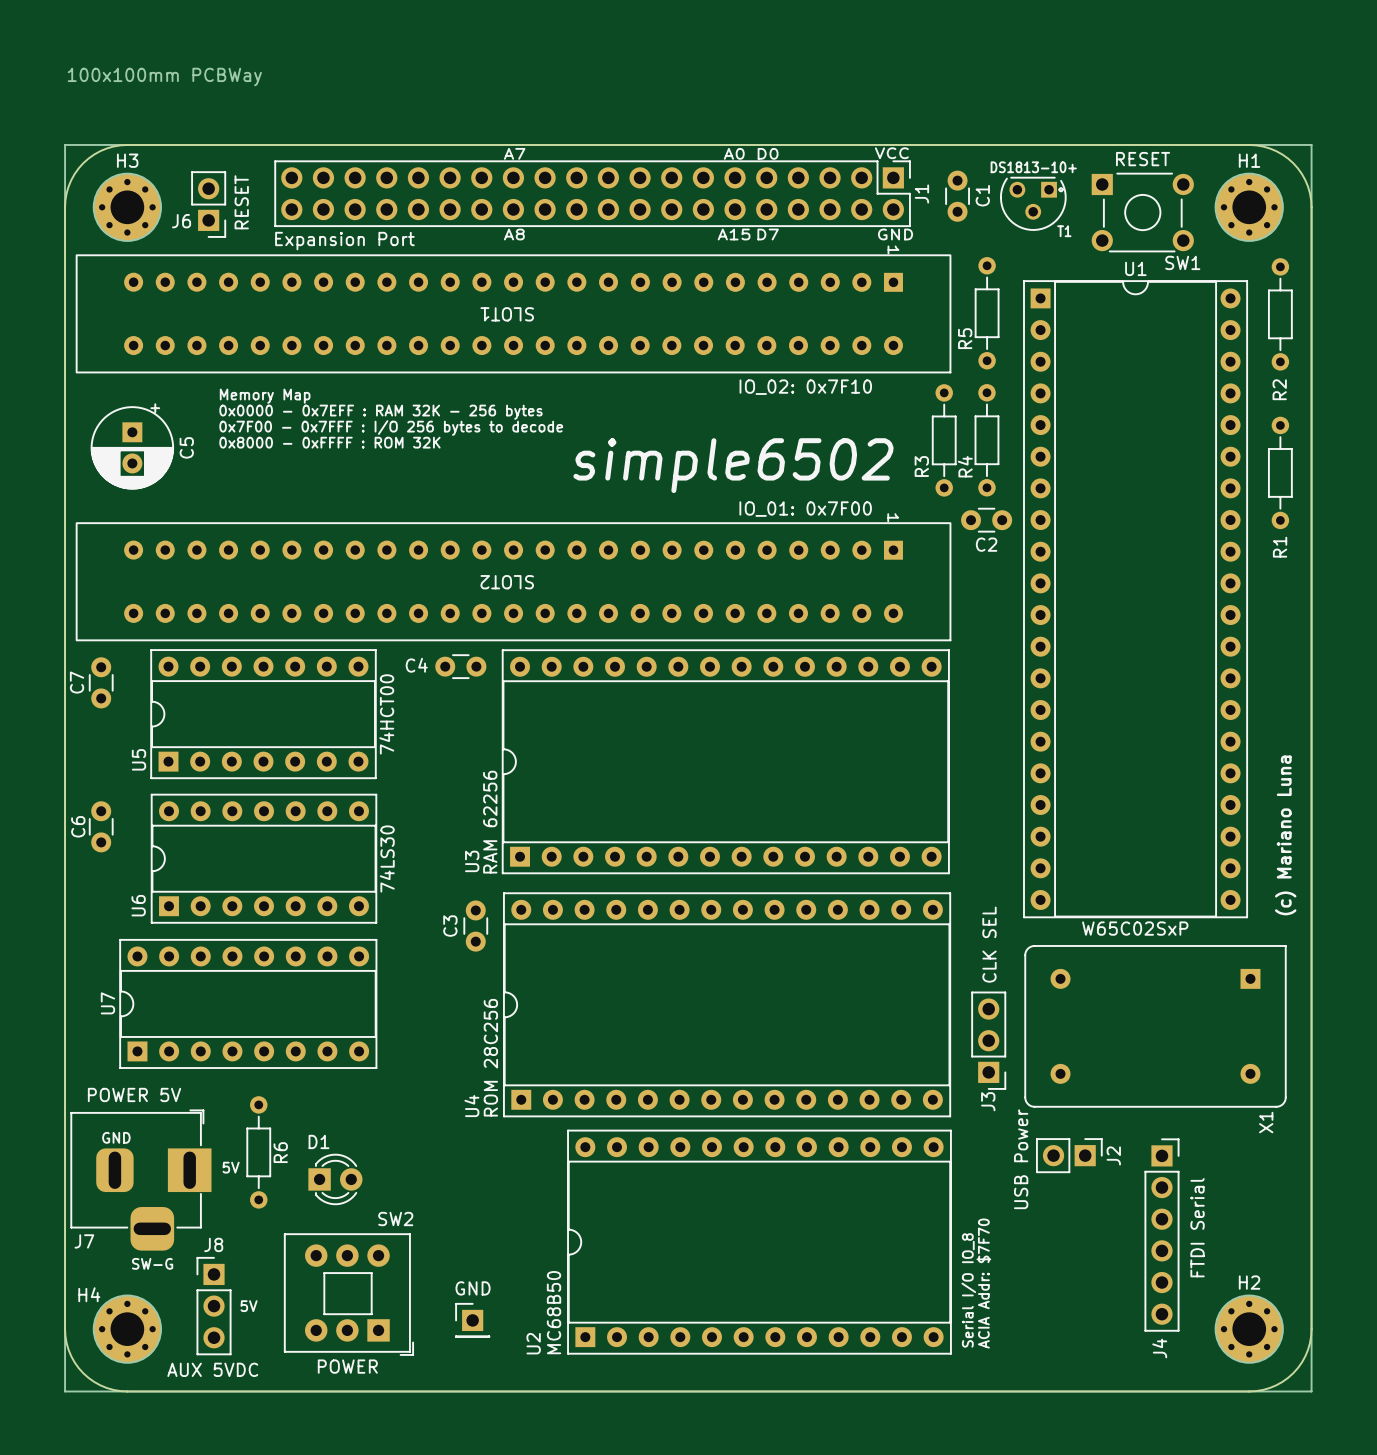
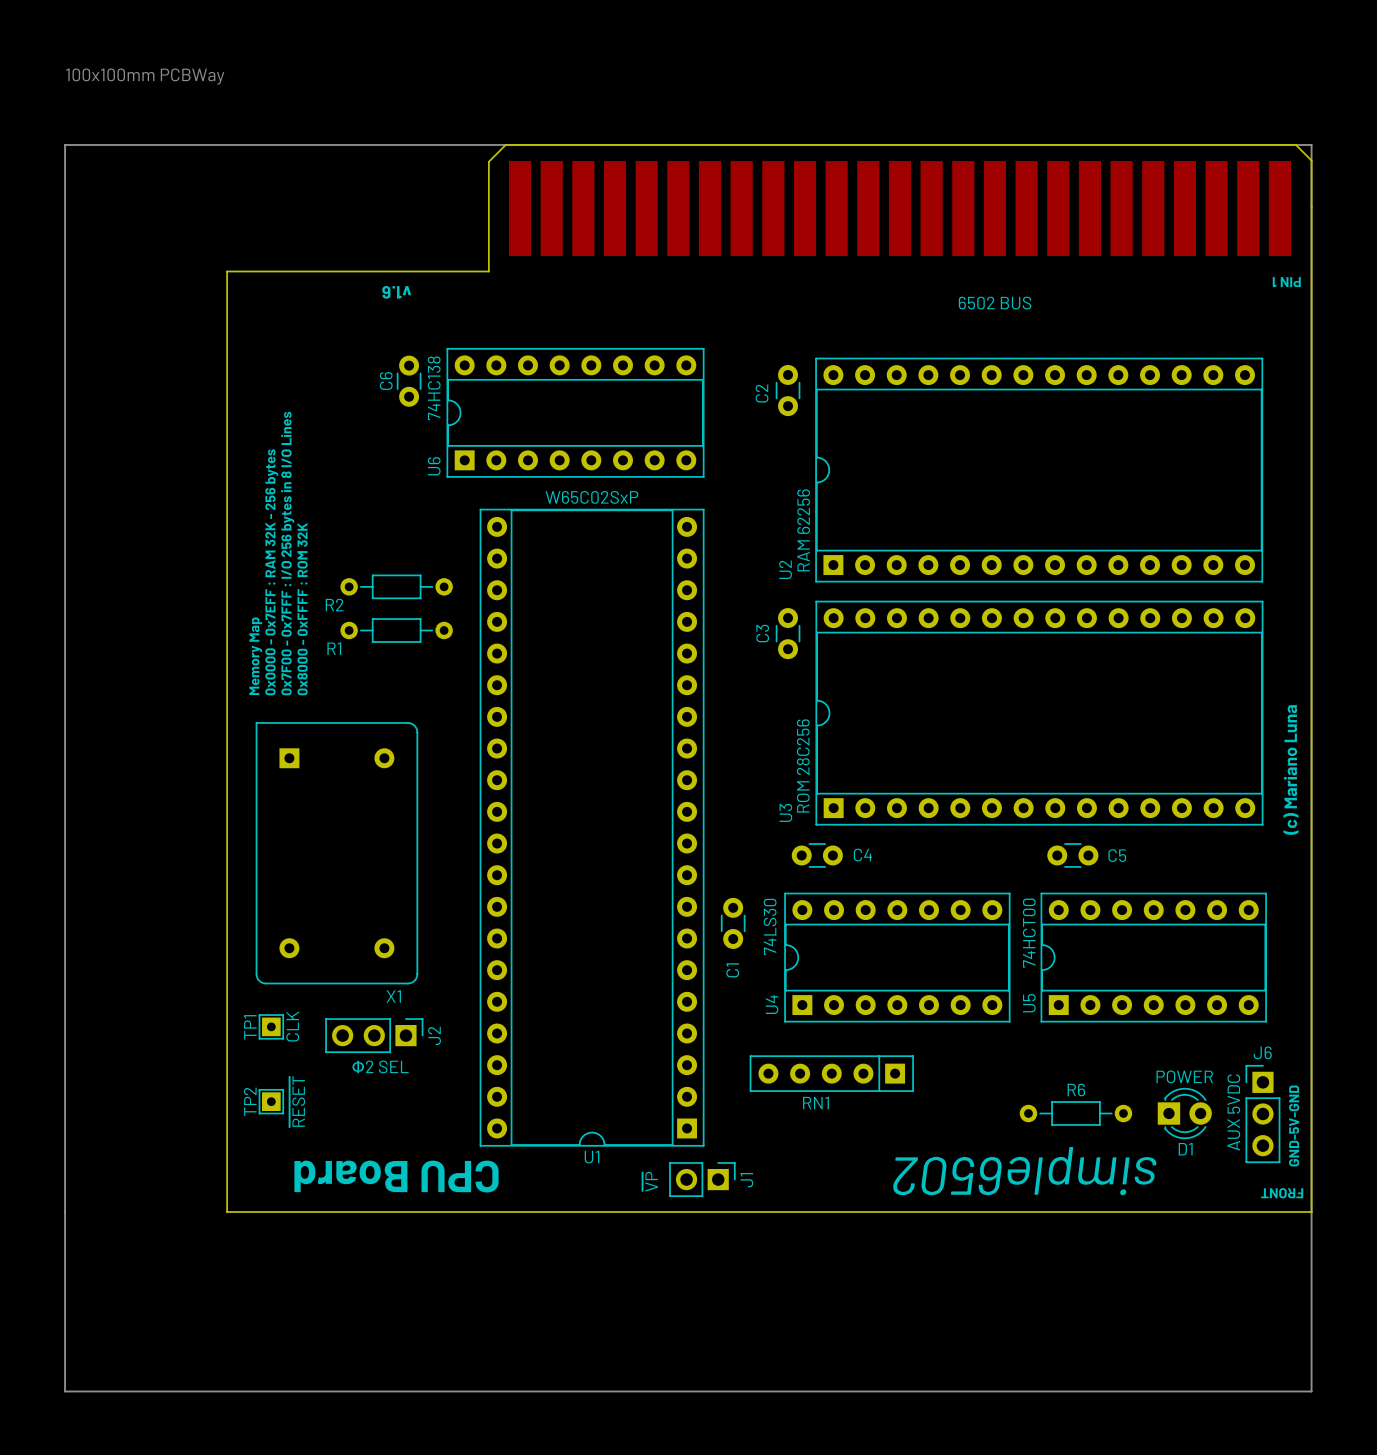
board edge: (505, 144) (120, 145) (100, 151) (88, 158) (78, 168) (68, 186) (65, 207) (65, 1329) (68, 1349) (78, 1368) (88, 1377) (100, 1385) (113, 1389) (127, 1391) (1256, 1391) (1269, 1387) (1288, 1377) (1302, 1362) (1308, 1349) (1311, 1329) (1311, 1211) -> (505, 144) (488, 161) (488, 271) (227, 271) (227, 1211) (1311, 1211)
board edge: (1249, 144) (1263, 146) (1276, 151) (1293, 163) (1302, 174) (1308, 186) (1311, 207) -> (1249, 144) (1295, 144) (1311, 160) (1311, 207)
text: A7 (514, 153) -> none
text: A0 (734, 153) -> none
text: D0 (768, 153) -> none
text: VCC (891, 153) -> none
J1 footprint: [274, 160, 911, 227] -> [669, 1162, 736, 1197]
J6 footprint: [191, 171, 226, 238] -> [1245, 1065, 1281, 1164]
J1 name position: J1 (921, 194) -> J1 (746, 1180)
C1 name position: C1 (982, 195) -> C1 (732, 970)
C1 position: (957, 196) -> (733, 923)
J6 value: RESET (241, 202) -> AUX 5VDC (1233, 1112)
T1: DS1813-10+ (1033, 203) -> none
H3: (127, 207) -> none
H1: (1249, 207) -> none
part: none -> 6502 BUS (899, 208)
SW1: RESET (1142, 212) -> none
J6 name position: J6 (181, 221) -> J6 (1262, 1052)
text: A8 (514, 234) -> none
text: A15 (734, 234) -> none
text: D7 (768, 234) -> none
text: GND (895, 234) -> none
J1 value: Expansion Port (344, 241) -> ~{VP} (650, 1181)
text: none -> PIN 1 (1286, 282)
text: none -> v1.6 (396, 292)
SLOT1: IO_02: 0x7F10 (513, 313) -> none
R5: (987, 313) -> none
R2 rotation: 0° (1280, 314) -> 90° clockwise (396, 586)
R2 position: (1280, 314) -> (396, 586)
text rotation: 0° (265, 396) -> 90° counterclockwise (255, 656)
text position: Memory Map (265, 396) -> Memory Map (255, 656)
C5 footprint: [90, 403, 174, 490] -> [1047, 843, 1099, 868]
text rotation: 0° (381, 412) -> 90° counterclockwise (271, 572)
text: 0x7F00 - 0x7FFF : I/O 256 bytes to decode (391, 428) -> 0x7F00 - 0x7FFF : I/O 256 bytes in 8 I/O Lines (287, 553)
R3: (944, 440) -> none
R4: (986, 440) -> none
text rotation: 0° (329, 442) -> 90° counterclockwise (302, 609)
text: simple6502 (733, 465) -> none
R1 rotation: 0° (1280, 472) -> 90° clockwise (396, 630)
R1 position: (1280, 472) -> (396, 630)
C2 rotation: 0° (986, 520) -> 90° clockwise (788, 390)
C2 position: (986, 520) -> (788, 390)
SLOT2: IO_01: 0x7F00 (513, 581) -> none
U1 rotation: 0° (1135, 599) -> 180° (592, 827)
U1 position: (1135, 599) -> (592, 827)
C4 name position: C4 (416, 665) -> C4 (862, 855)
C4 position: (460, 666) -> (817, 855)
C7: (101, 682) -> none
U5 position: (263, 714) -> (1153, 957)
U5 value position: 74HCT00 (386, 714) -> 74HCT00 (1029, 933)
U3 position: (725, 761) -> (1039, 713)
U6 footprint: [150, 793, 378, 924] -> [446, 348, 705, 478]
U3 value: RAM 62256 (490, 822) -> ROM 28C256 (803, 765)
C6 position: (101, 826) -> (409, 381)
text position: (c) Mariano Luna (1285, 835) -> (c) Mariano Luna (1291, 770)
U6 value: 74LS30 (387, 859) -> 74HC138 (434, 388)
U4 footprint: [503, 892, 951, 1118] -> [784, 892, 1011, 1023]
C3 position: (475, 926) -> (788, 633)
U7: (248, 1003) -> none
TP1: none -> CLK (271, 1026)
X1 rotation: 0° (1155, 1026) -> 90° counterclockwise (336, 853)
X1 position: (1155, 1026) -> (336, 853)
J3: CLK SEL (988, 1040) -> none
U4 value: ROM 28C256 (490, 1057) -> 74LS30 (770, 926)
RN1: none -> (831, 1073)
D1 value: none -> POWER (1184, 1076)
TP2: none -> ~{RESET} (271, 1101)
U4 name position: U4 (471, 1106) -> U4 (772, 1004)
text: none -> GND-5V-GND (1294, 1126)
X1 name position: X1 (1266, 1122) -> X1 (393, 996)
U2 footprint: [567, 1129, 952, 1355] -> [815, 357, 1264, 583]
text: GND (116, 1137) -> none
J2 footprint: [1036, 1138, 1103, 1173] -> [325, 1018, 424, 1053]
D1 name position: D1 (319, 1141) -> D1 (1185, 1149)
R6 rotation: 0° (258, 1152) -> 90° clockwise (1075, 1113)
R6 position: (258, 1152) -> (1075, 1113)
R6 name position: R6 (280, 1152) -> R6 (1076, 1089)
J2 value: USB Power (1021, 1159) -> Φ2 SEL (380, 1066)
text: 5V (231, 1167) -> none
text: none -> simple6502 (1024, 1171)
text: none -> CPU Board (396, 1176)
D1 position: (335, 1179) -> (1184, 1113)
J7: POWER 5V (141, 1180) -> none
text: none -> FRONT (1282, 1193)
J4: FTDI Serial (1161, 1235) -> none
text: SW-G (152, 1263) -> none
text: ACIA Addr: $7F70 (983, 1283) -> none
text: GND (473, 1288) -> none
text: Serial I/O IO_8 (968, 1290) -> none
SW2: POWER (348, 1294) -> none
J8: AUX 5VDC (214, 1306) -> none
text: 5V (249, 1306) -> none
U2 value: MC68B50 (554, 1312) -> RAM 62256 (803, 530)
part: (472, 1320) -> none
H4: (127, 1329) -> none
H2: (1249, 1329) -> none
U2 name position: U2 (533, 1343) -> U2 (785, 569)

